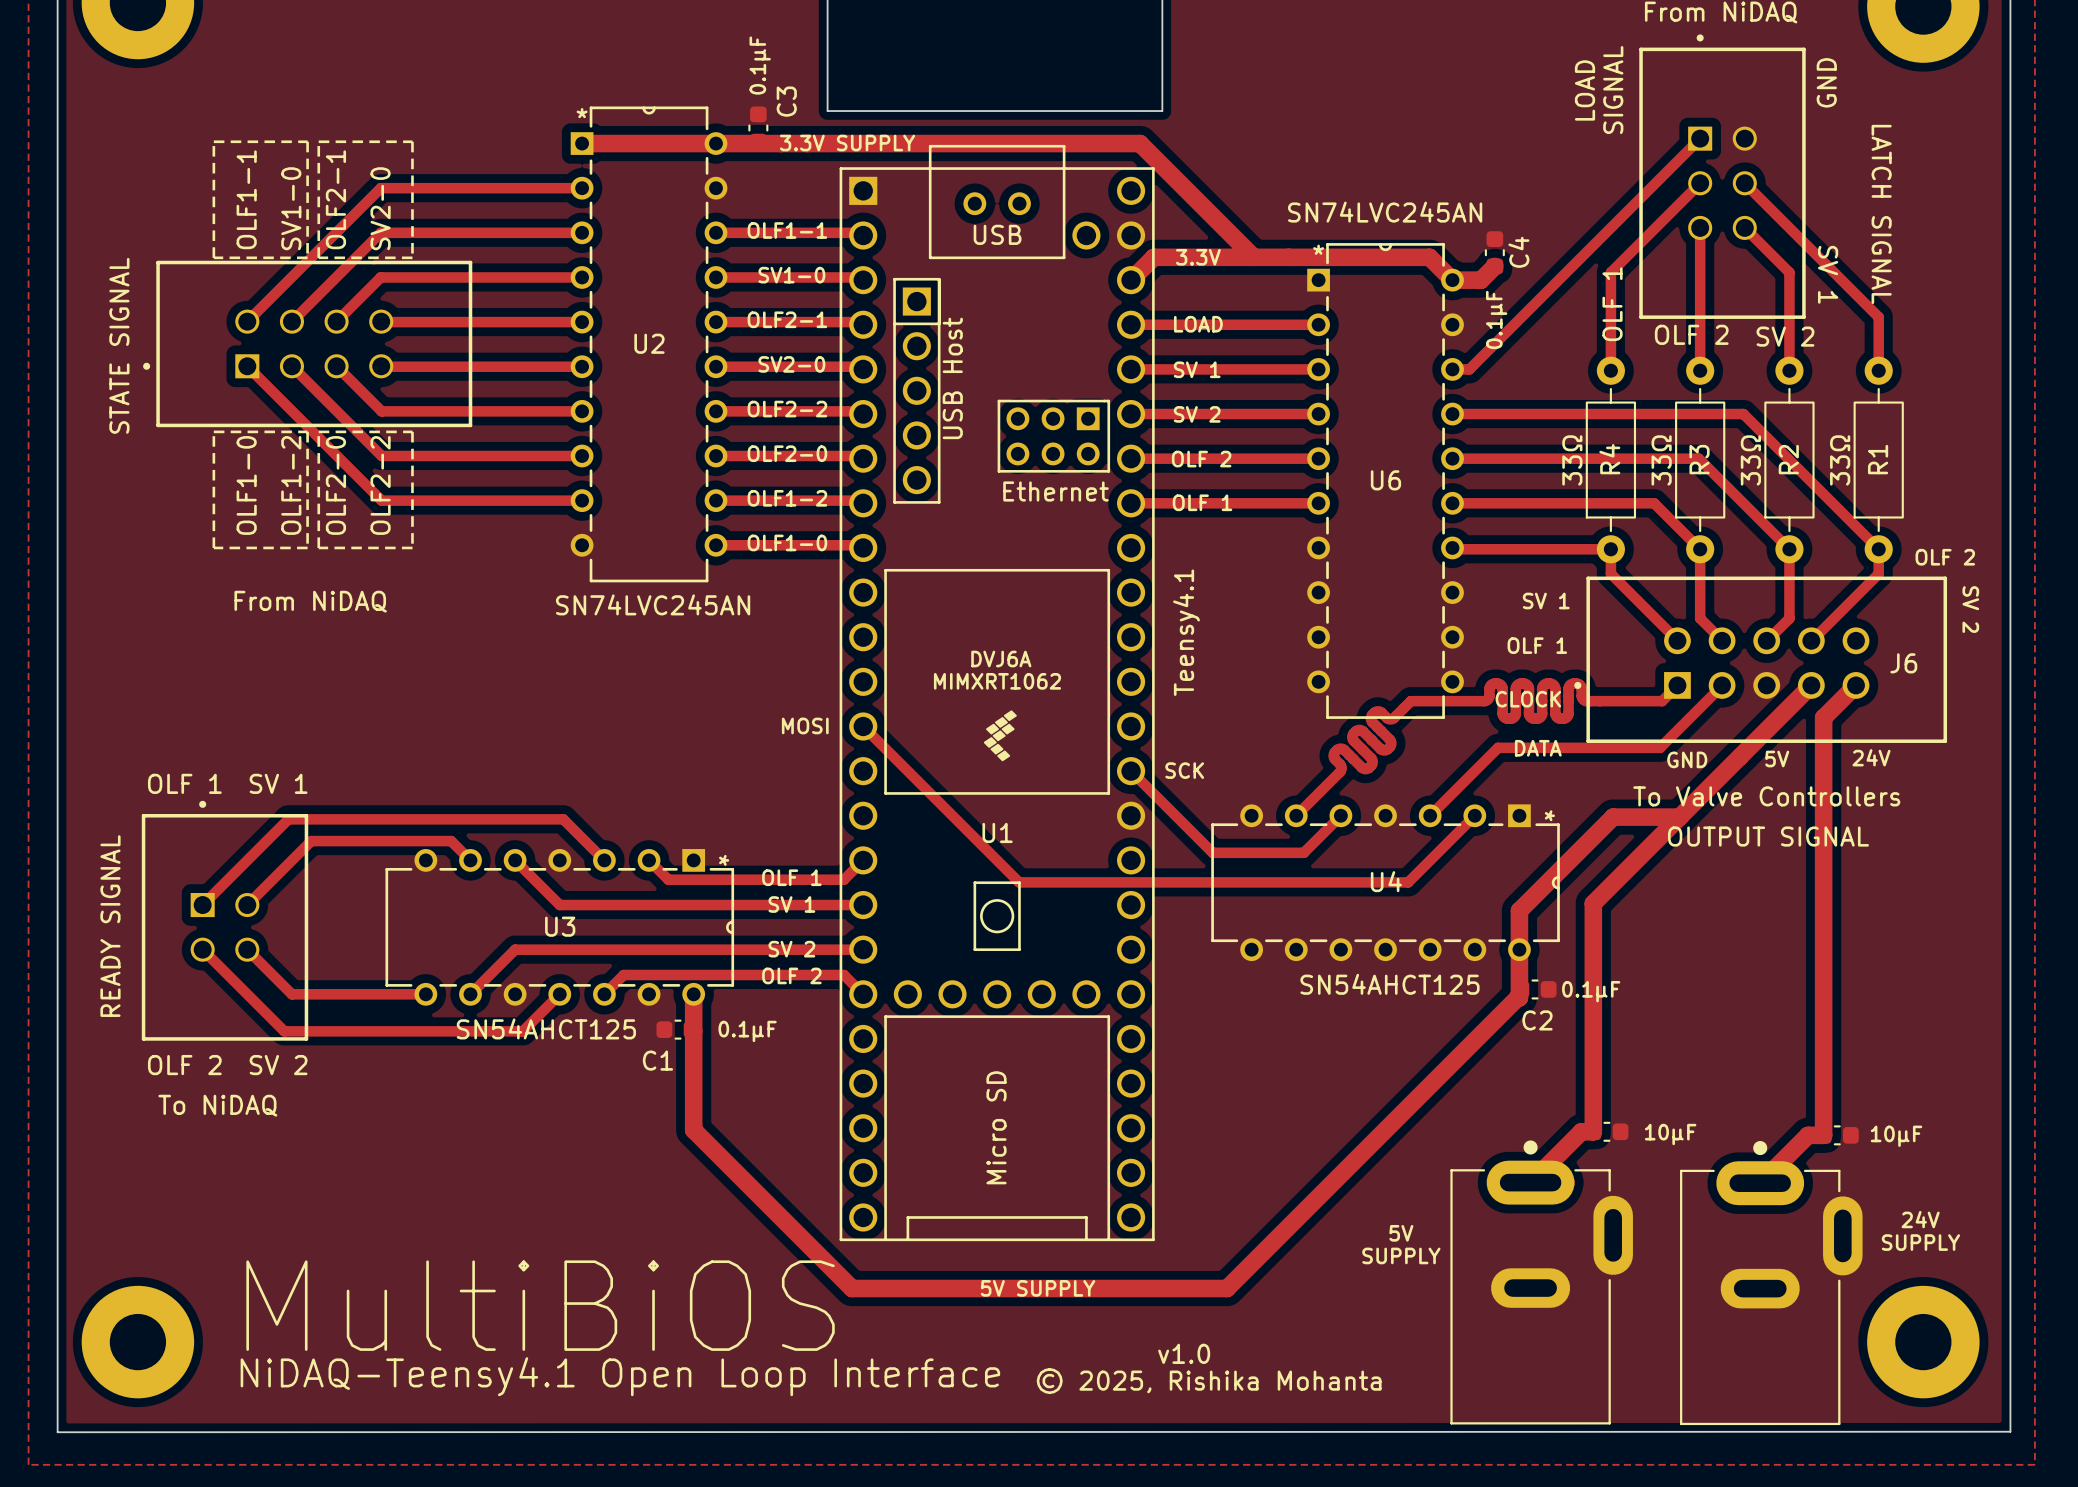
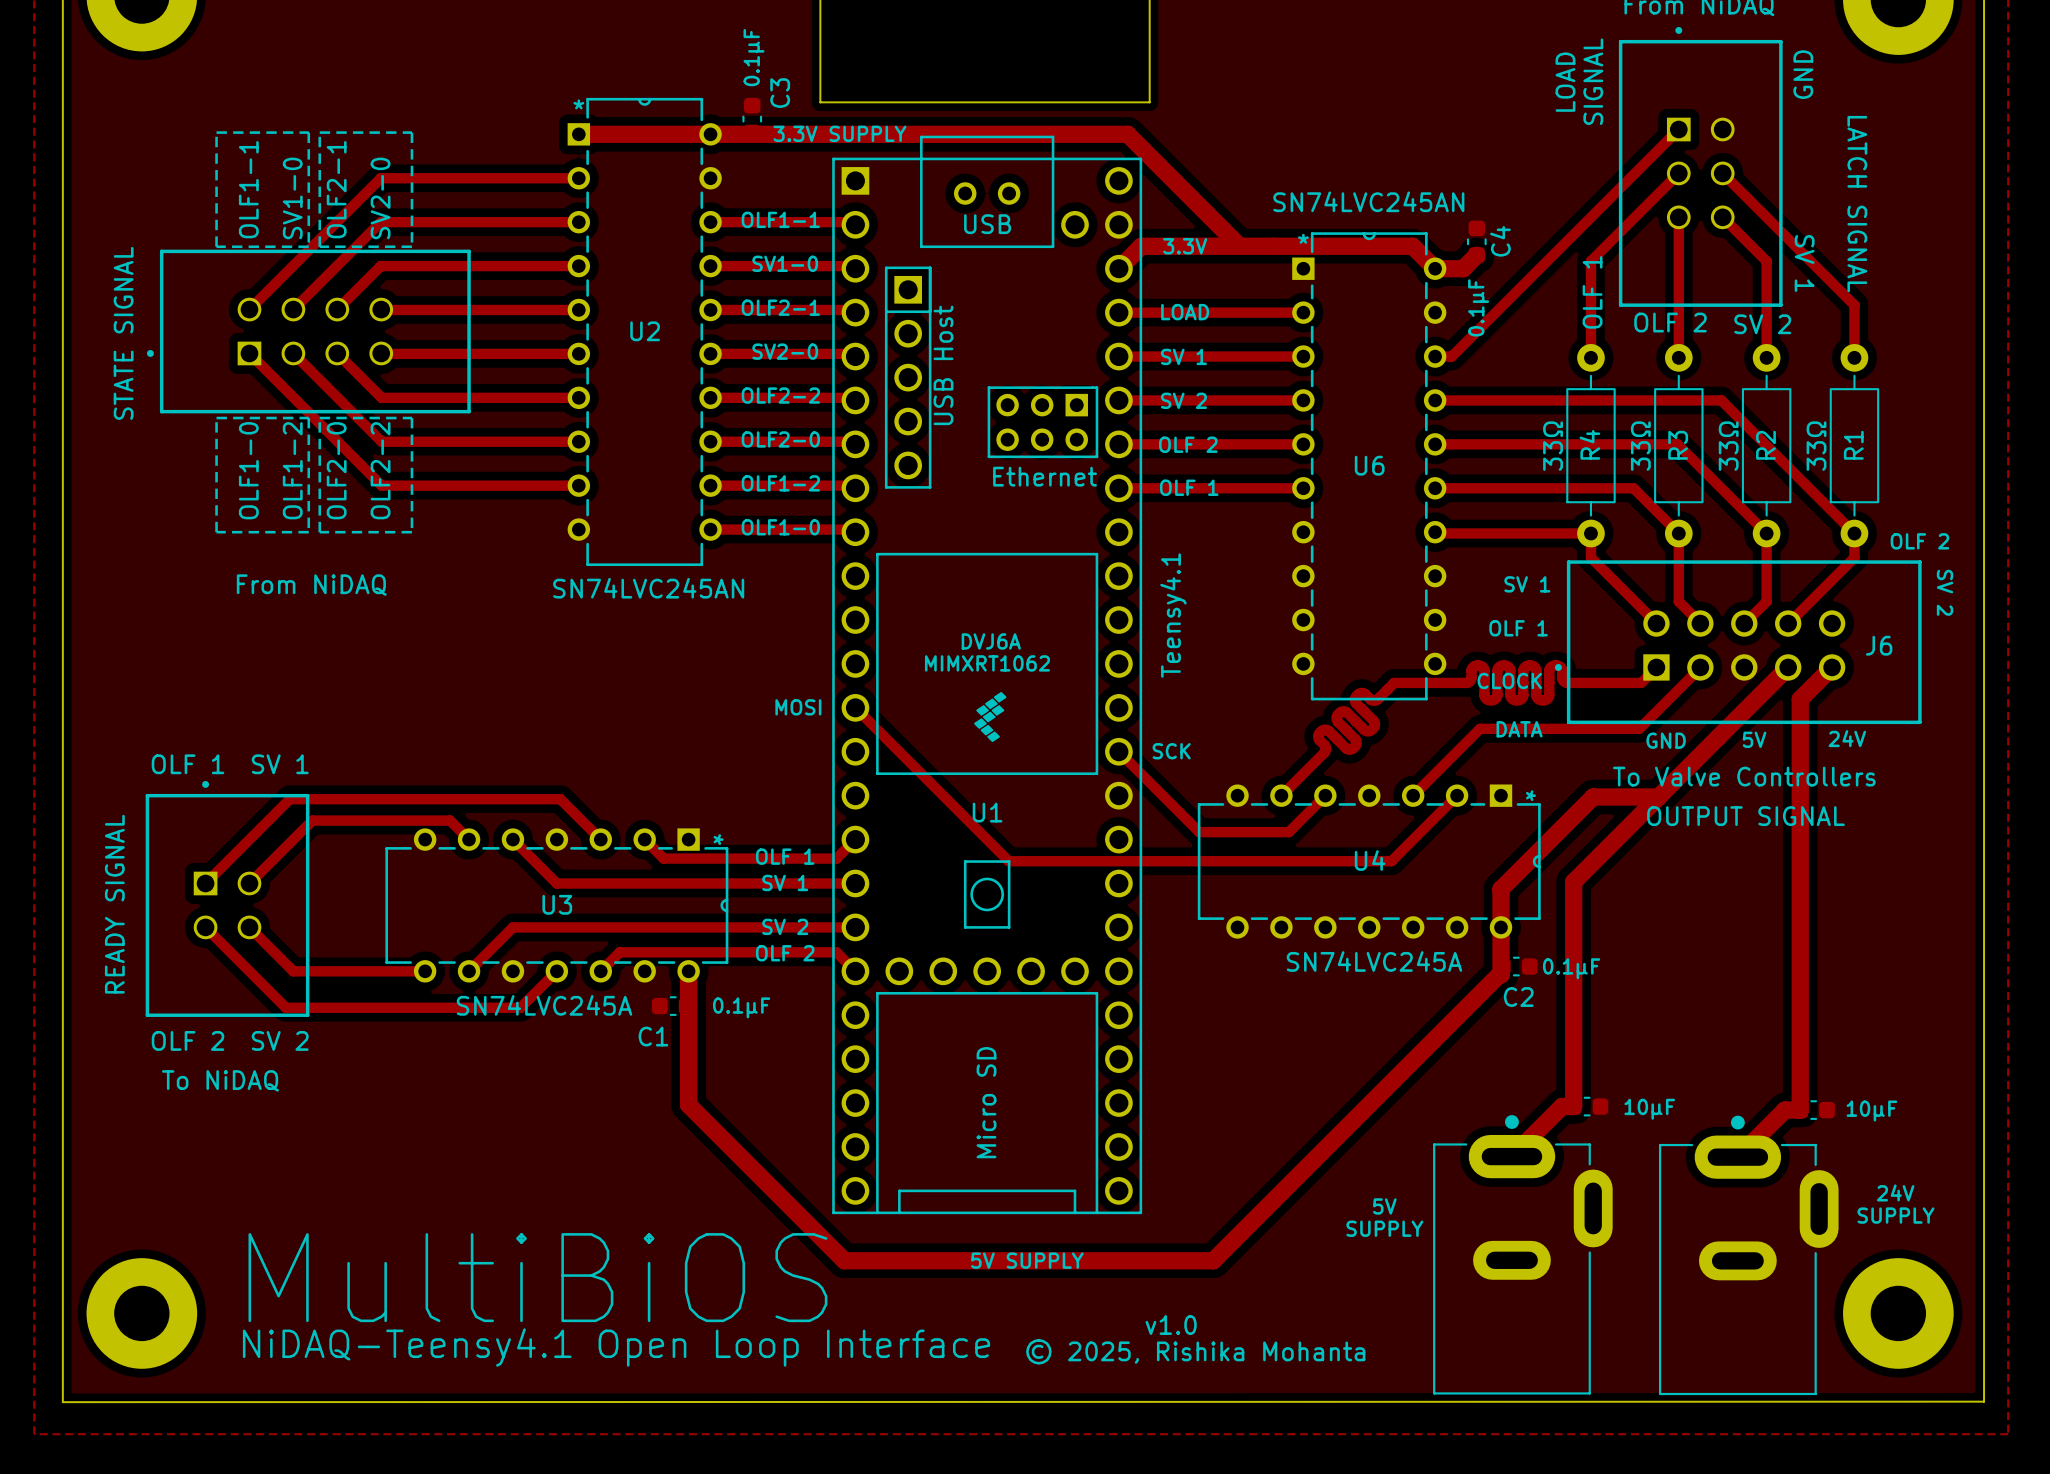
text: SN54AHCT125 (1390, 984) -> SN74LVC245A (1374, 961)
text: SN54AHCT125 (546, 1028) -> SN74LVC245A (544, 1005)

